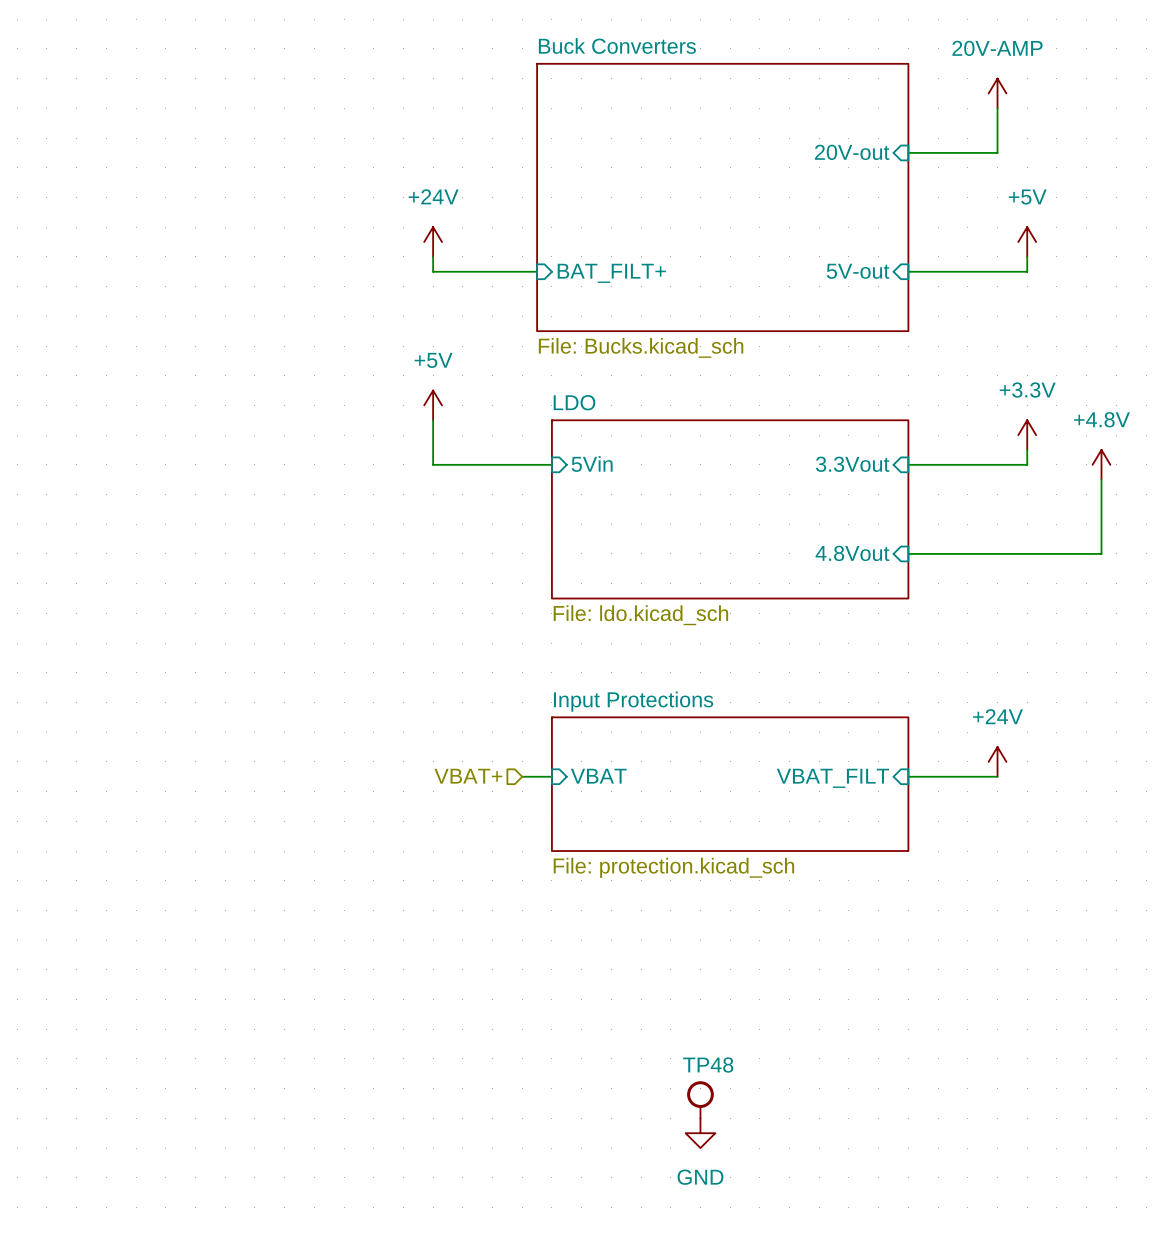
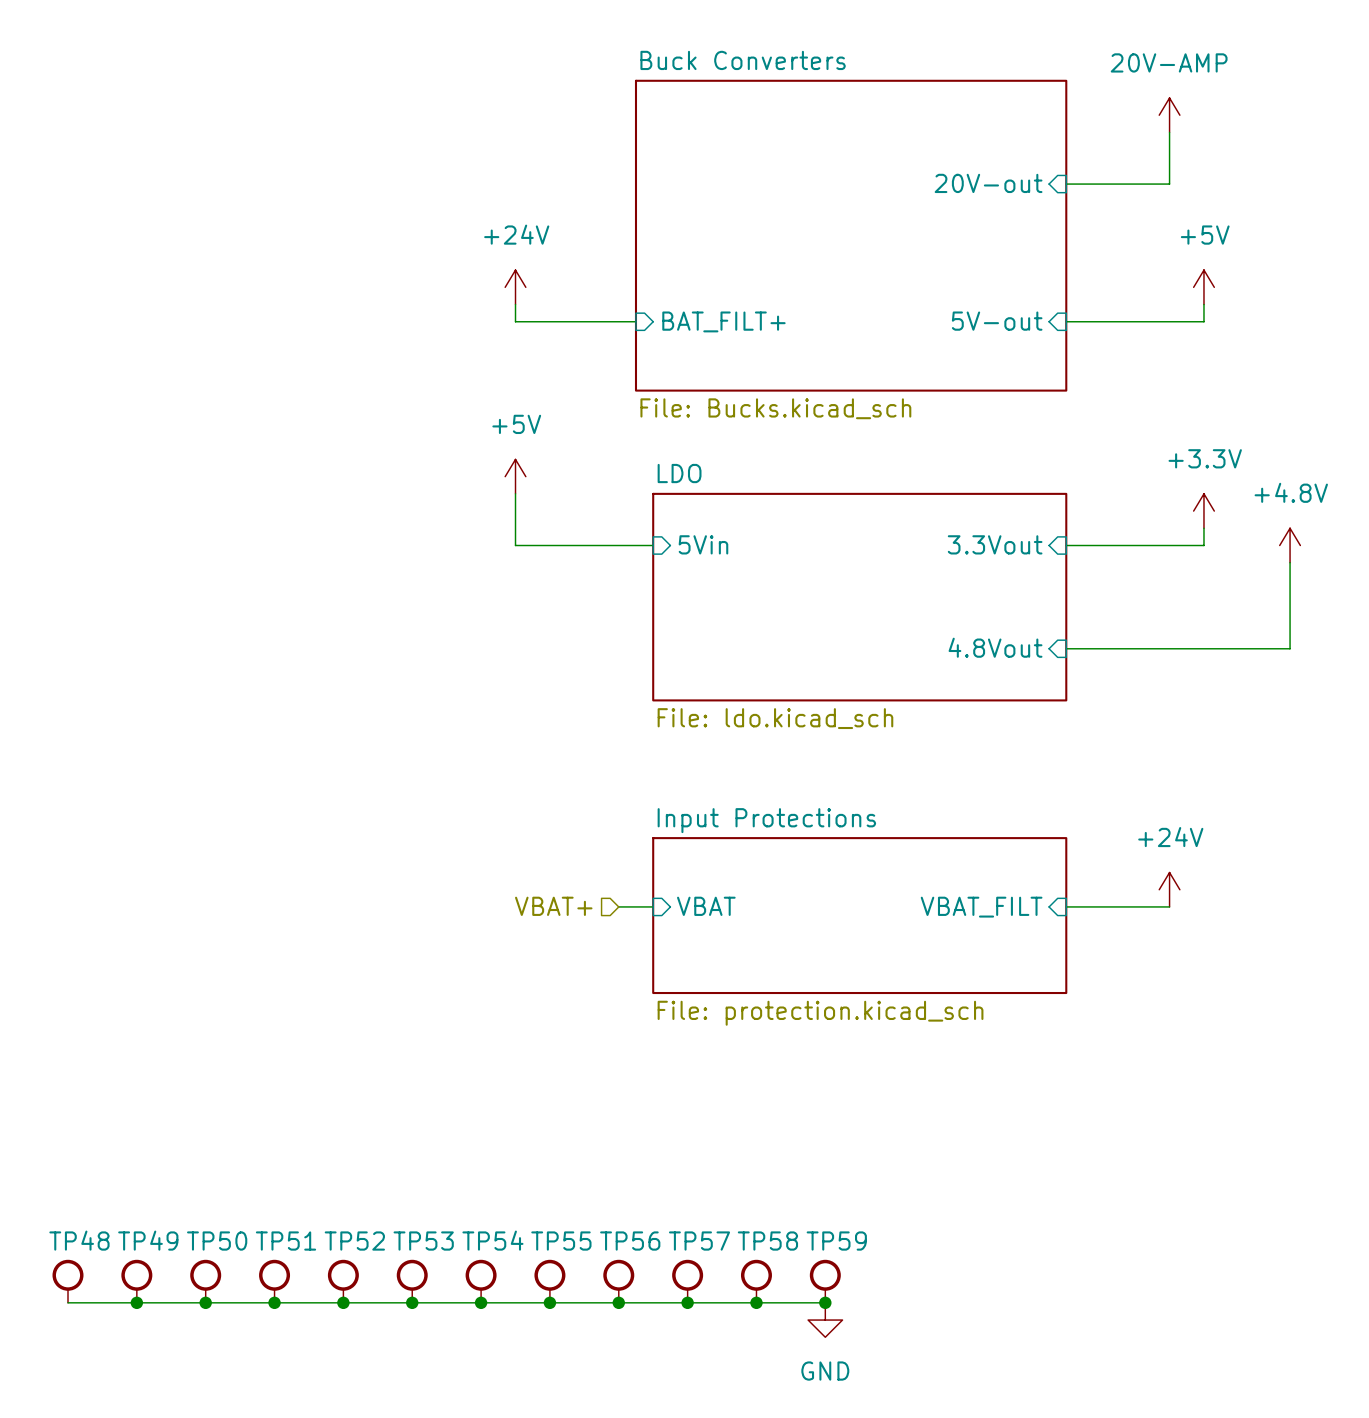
TP48 name: TP48 (708, 1065) -> TP59 (836, 1241)
TP48: none -> (68, 1281)
TP49: none -> (136, 1281)
TP50: none -> (205, 1281)
TP51: none -> (274, 1281)
TP52: none -> (343, 1281)
TP53: none -> (412, 1281)
TP54: none -> (481, 1281)
TP55: none -> (549, 1281)
TP56: none -> (618, 1281)
TP57: none -> (687, 1281)
TP58: none -> (756, 1281)
wire: none -> (68, 1302) (825, 1302)
junction: none -> (136, 1302)
junction: none -> (205, 1302)
junction: none -> (274, 1302)
junction: none -> (343, 1302)
junction: none -> (412, 1302)
junction: none -> (481, 1302)
junction: none -> (549, 1302)
junction: none -> (618, 1302)
junction: none -> (687, 1302)
junction: none -> (756, 1302)
junction: none -> (825, 1302)

